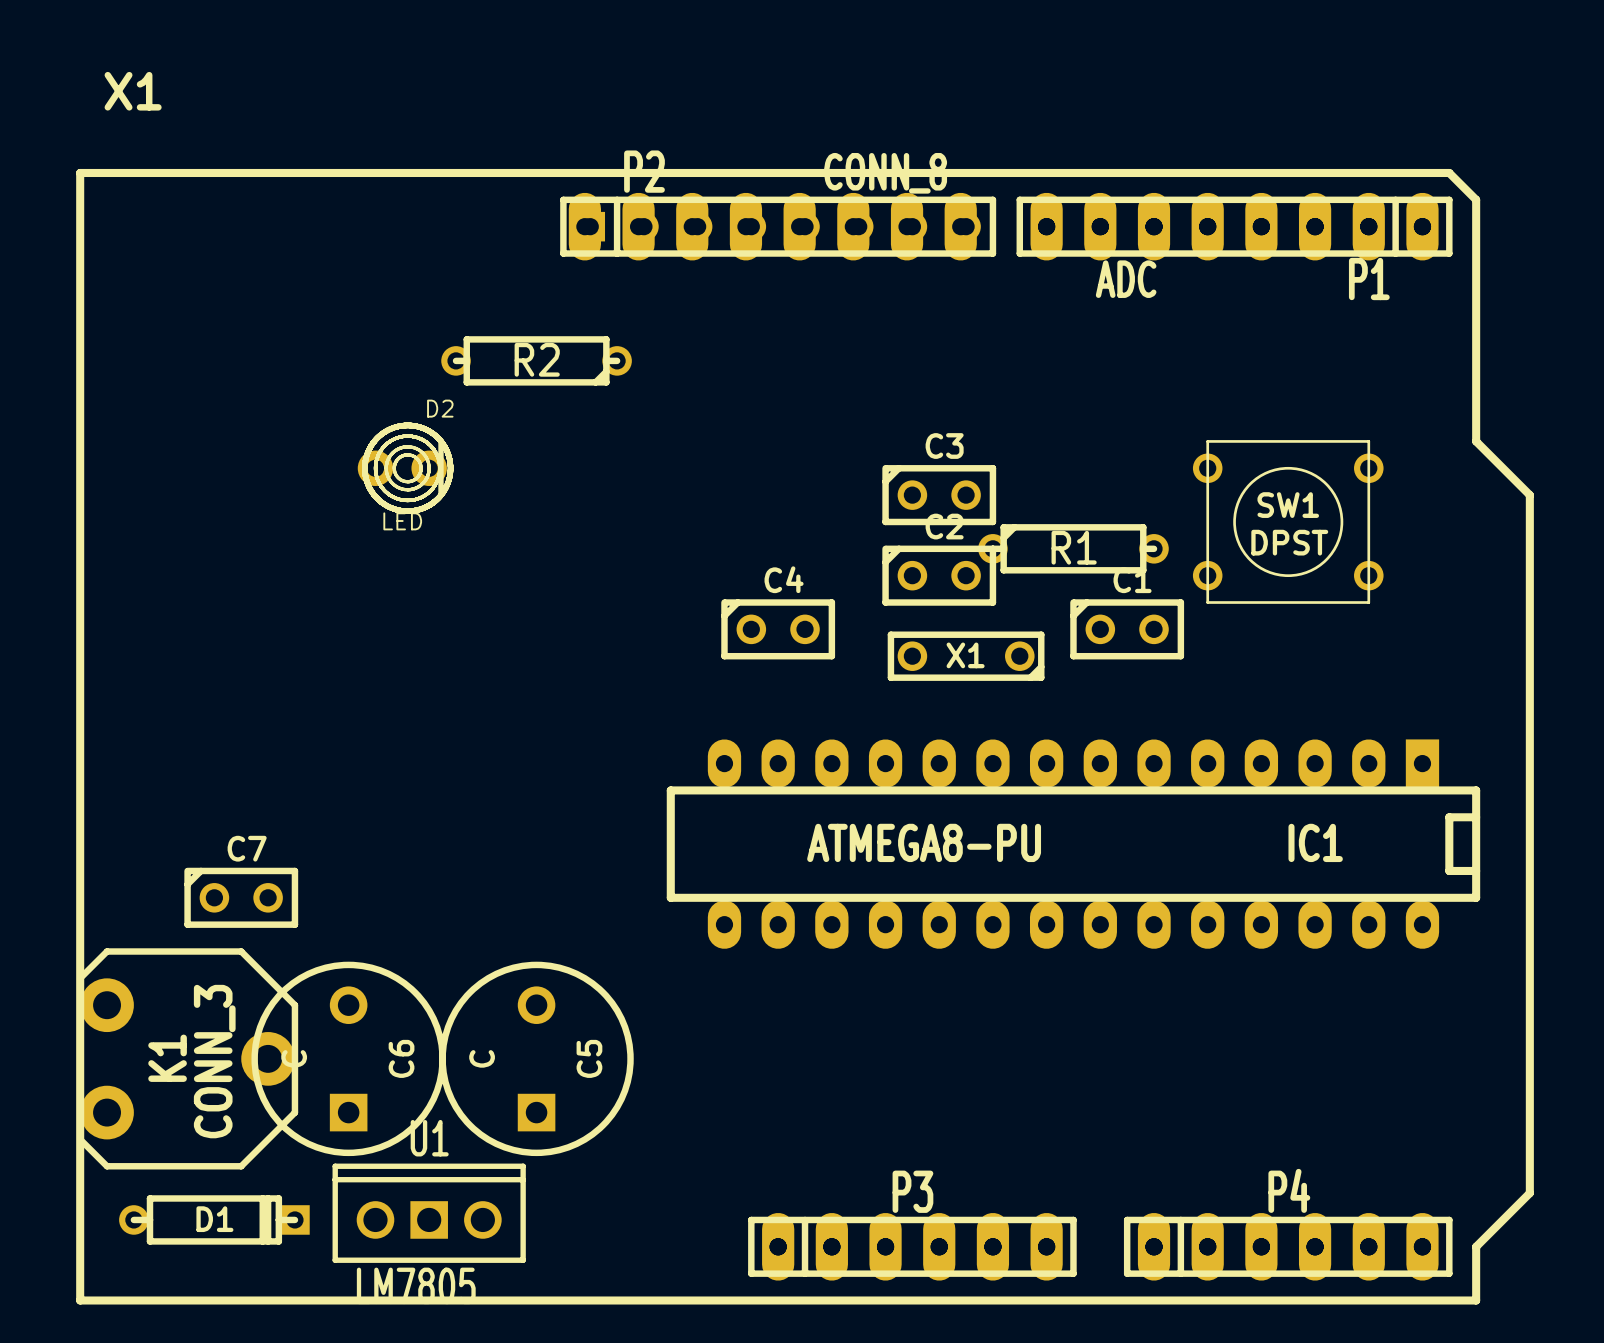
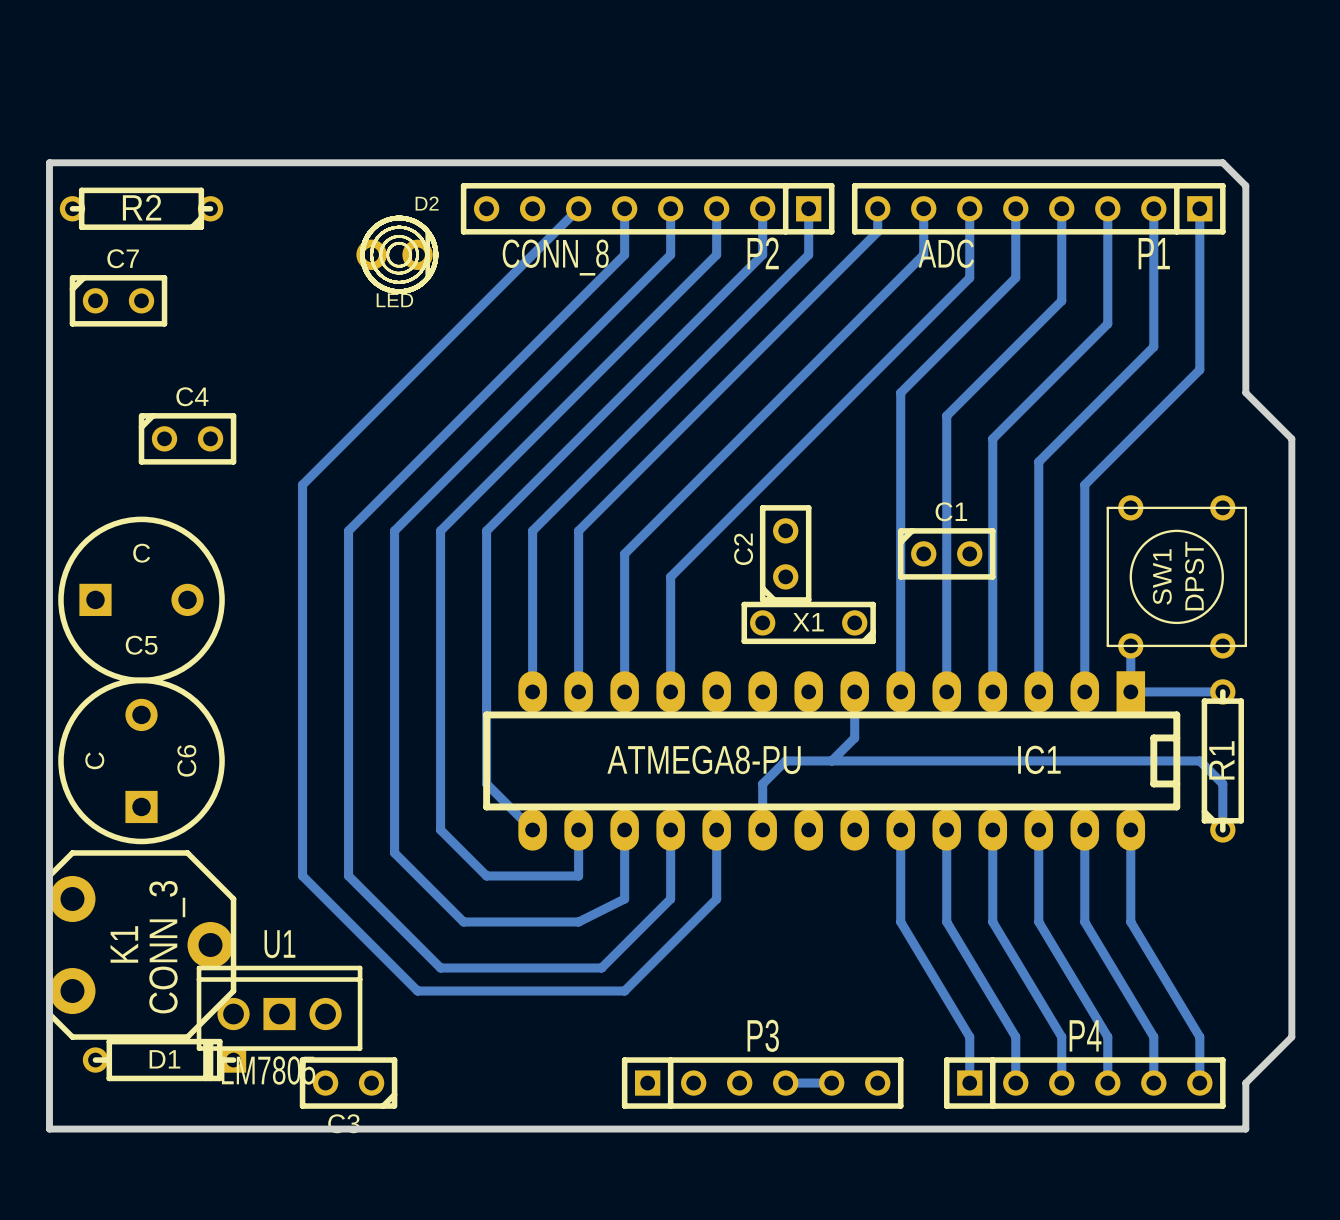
board edge: none -> (49, 162) (1222, 162) (1245, 185) (1245, 392) (1291, 438) (1291, 1037) (1245, 1083) (1245, 1129) (49, 1129) (49, 162)
bottom track: none -> (578, 208) (302, 484) (302, 875) (417, 991) (624, 991) (716, 898) (716, 829)
bottom track: none -> (624, 208) (624, 254) (348, 530) (348, 875) (440, 968) (601, 968) (670, 898) (670, 829)
P2 rotation: 0° (778, 226) -> 180° (647, 208)
bottom track: none -> (670, 208) (670, 254) (394, 530) (394, 852) (463, 922) (578, 922) (624, 898) (624, 829)
bottom track: none -> (716, 208) (716, 254) (440, 530) (440, 829) (486, 875) (578, 875) (578, 829)
bottom track: none -> (762, 208) (762, 254) (486, 530) (486, 783) (532, 829)
bottom track: none -> (808, 208) (808, 254) (532, 530) (532, 691)
bottom track: none -> (877, 208) (877, 231) (578, 530) (578, 691)
bottom track: none -> (923, 208) (923, 254) (624, 553) (624, 691)
bottom track: none -> (969, 208) (969, 277) (670, 576) (670, 691)
bottom track: none -> (1015, 208) (1015, 277) (900, 392) (900, 691)
bottom track: none -> (1061, 208) (1061, 300) (946, 415) (946, 691)
bottom track: none -> (1107, 208) (1107, 323) (992, 438) (992, 691)
bottom track: none -> (1153, 208) (1153, 346) (1038, 461) (1038, 691)
bottom track: none -> (1199, 208) (1199, 369) (1084, 484) (1084, 691)
R2 position: (536, 360) -> (141, 208)
D2 position: (405, 468) -> (397, 254)
C3 rotation: 0° (939, 495) -> 180° (348, 1083)
C3 position: (939, 495) -> (348, 1083)
SW1 rotation: 0° (1288, 521) -> 90° clockwise (1176, 576)
SW1 position: (1288, 521) -> (1176, 576)
R1 rotation: 0° (1073, 548) -> 90° counterclockwise (1222, 760)
R1 position: (1073, 548) -> (1222, 760)
C2 rotation: 0° (939, 575) -> 90° counterclockwise (785, 553)
C4 position: (778, 629) -> (187, 438)
X1 position: (966, 656) -> (808, 622)
X1: (805, 736) -> none
bottom track: none -> (1130, 645) (1130, 691) (1222, 691)
bottom track: none -> (854, 691) (854, 737) (831, 760)
IC1 position: (1073, 844) -> (831, 760)
C7 position: (241, 897) -> (118, 300)
bottom track: none -> (762, 829) (762, 783) (785, 760) (1199, 760) (1222, 783) (1222, 829)
bottom track: none -> (900, 829) (900, 922) (969, 1037) (969, 1083)
bottom track: none -> (946, 829) (946, 922) (1015, 1037) (1015, 1083)
bottom track: none -> (992, 829) (992, 922) (1061, 1037) (1061, 1083)
bottom track: none -> (1038, 829) (1038, 922) (1107, 1037) (1107, 1083)
bottom track: none -> (1084, 829) (1084, 922) (1153, 1037) (1153, 1083)
bottom track: none -> (1130, 829) (1130, 922) (1199, 1037) (1199, 1083)
K1 position: (187, 1058) -> (141, 945)
C6 position: (348, 1058) -> (141, 760)
C5 rotation: 0° (536, 1058) -> 90° clockwise (141, 599)
C5 position: (536, 1058) -> (141, 599)
U1 position: (429, 1213) -> (279, 1008)
bottom track: none -> (785, 1083) (831, 1083)

